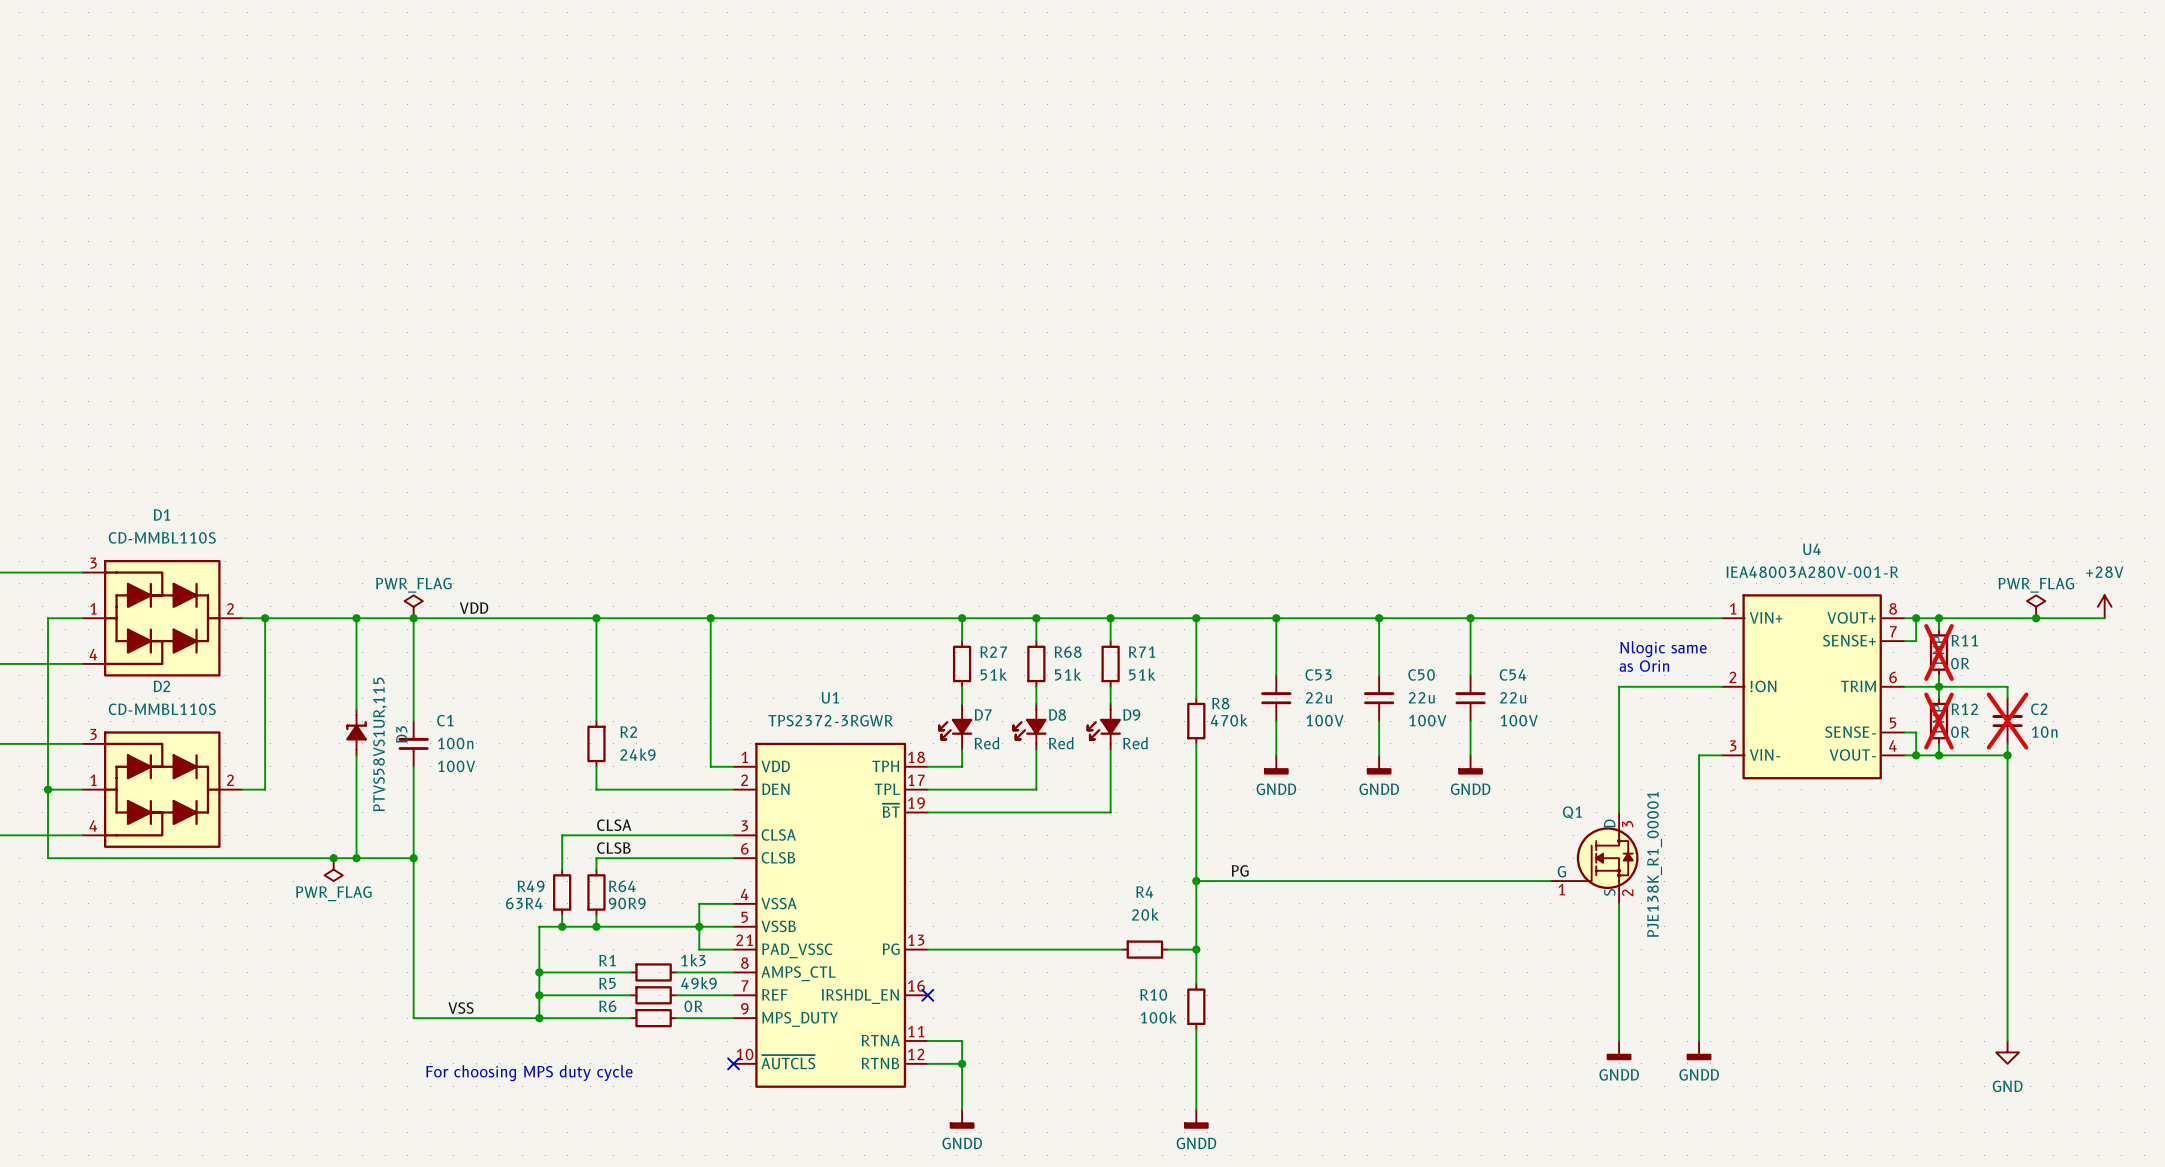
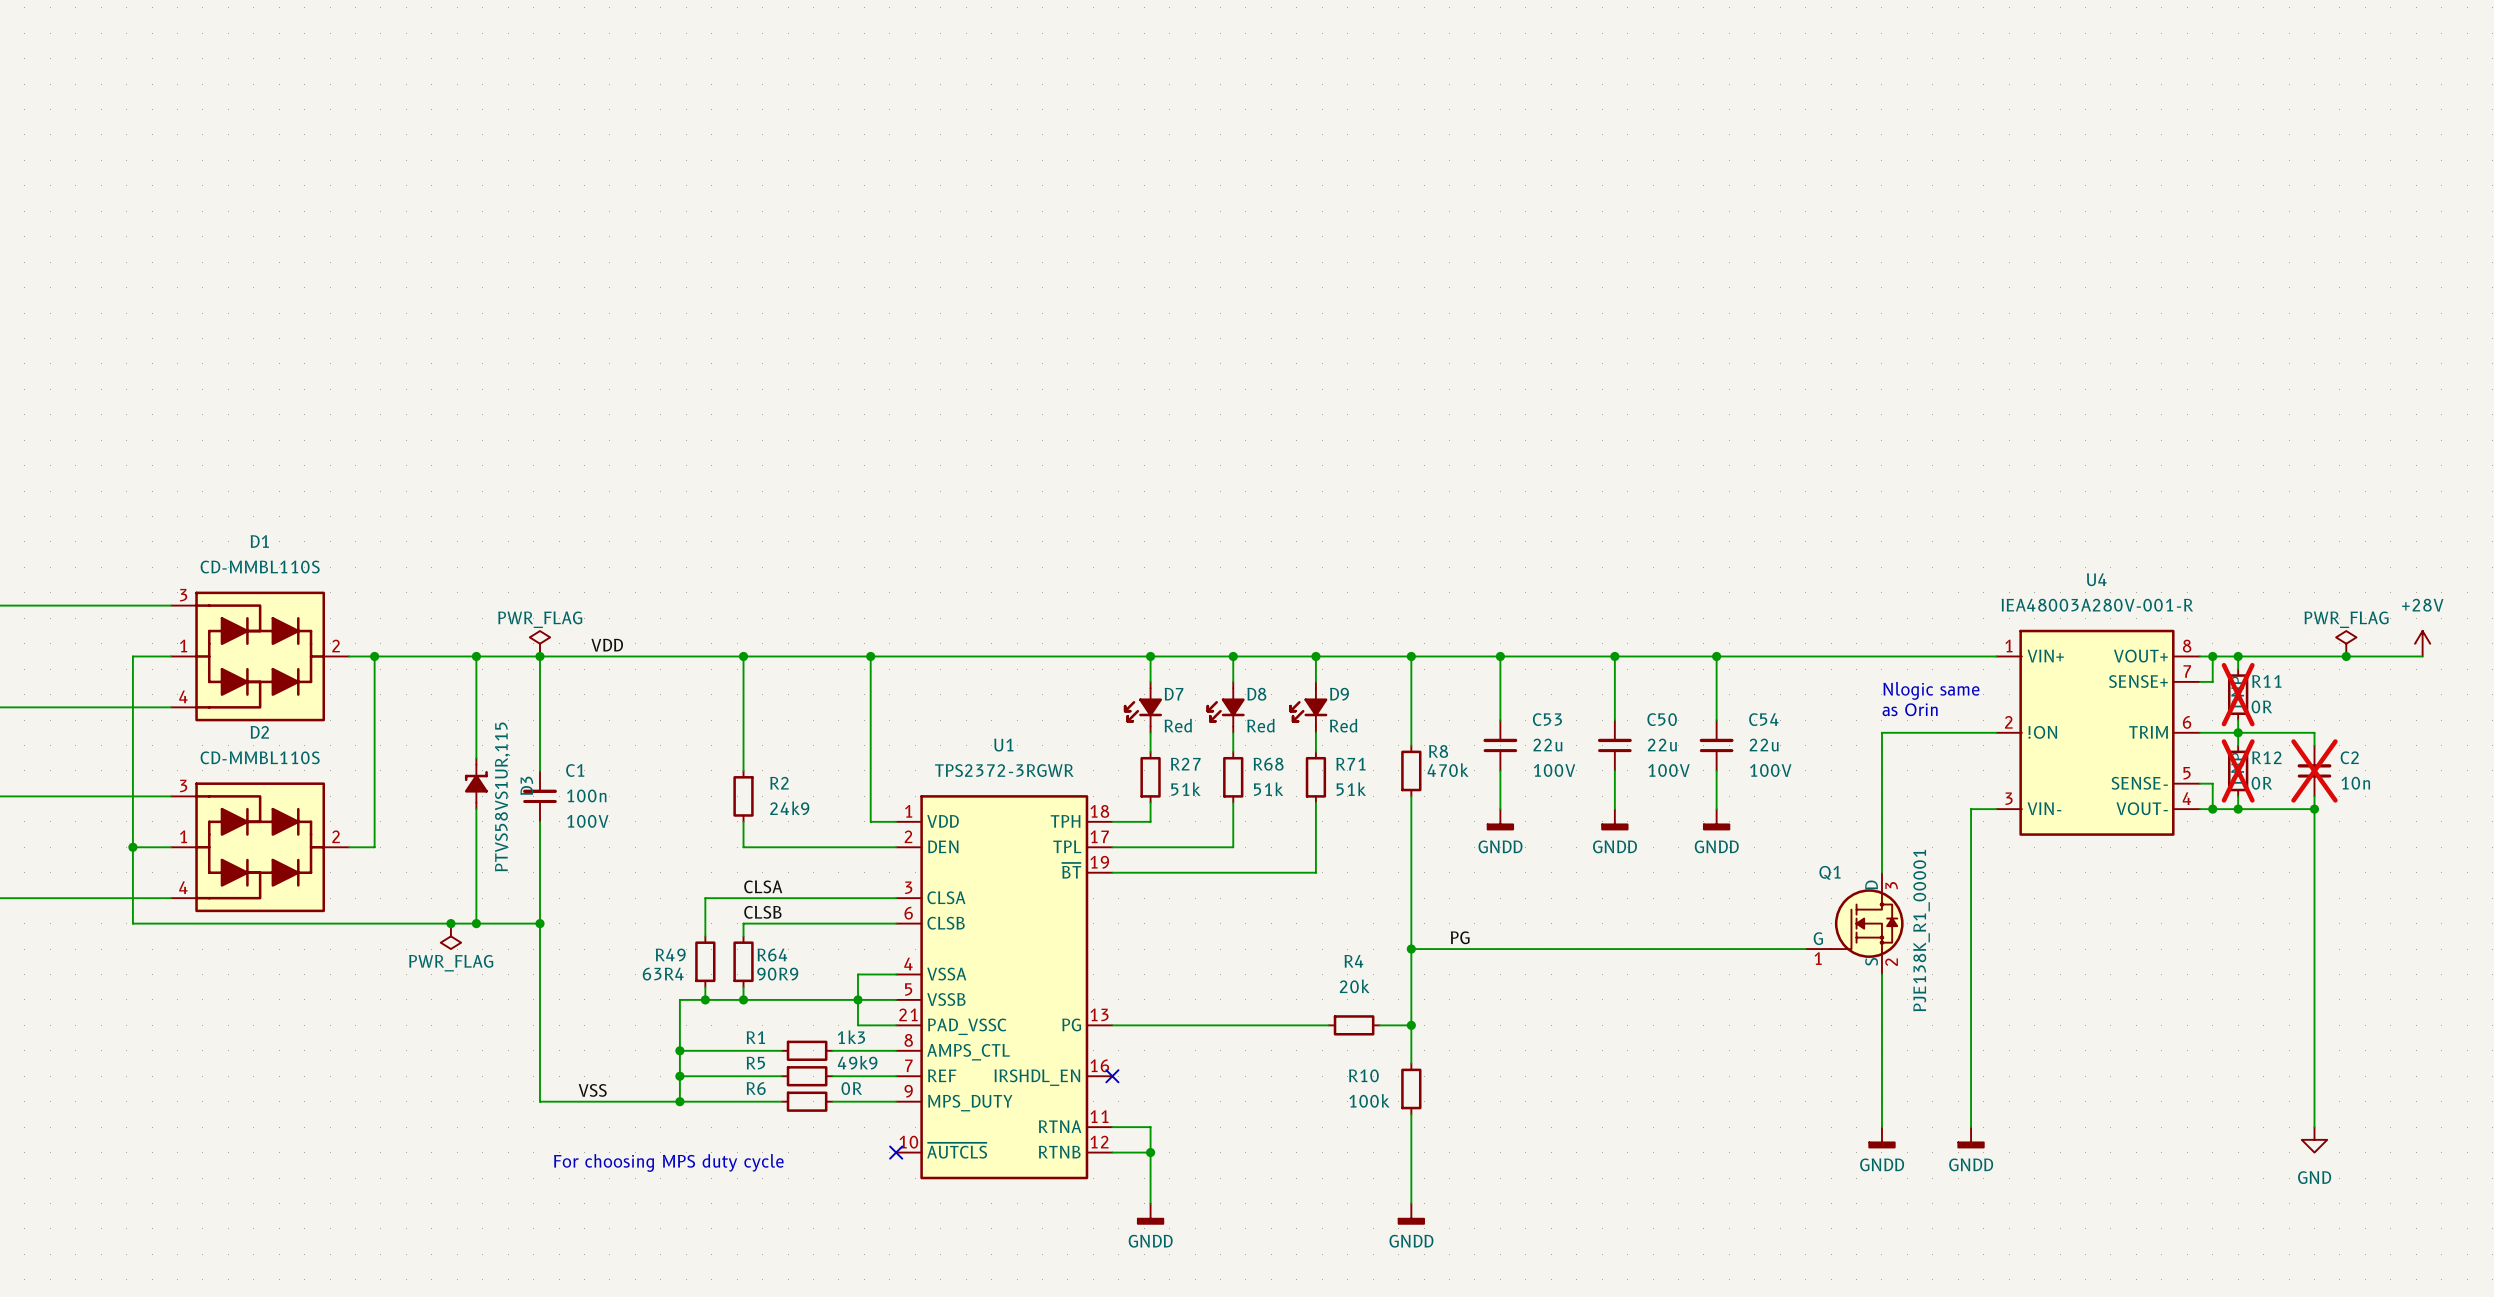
R27 position: (962, 663) -> (1150, 777)
R68 position: (1036, 663) -> (1233, 777)
R71 position: (1110, 663) -> (1315, 777)
D7 position: (955, 726) -> (1142, 707)
D8 position: (1029, 726) -> (1225, 707)
D9 position: (1103, 726) -> (1308, 707)

